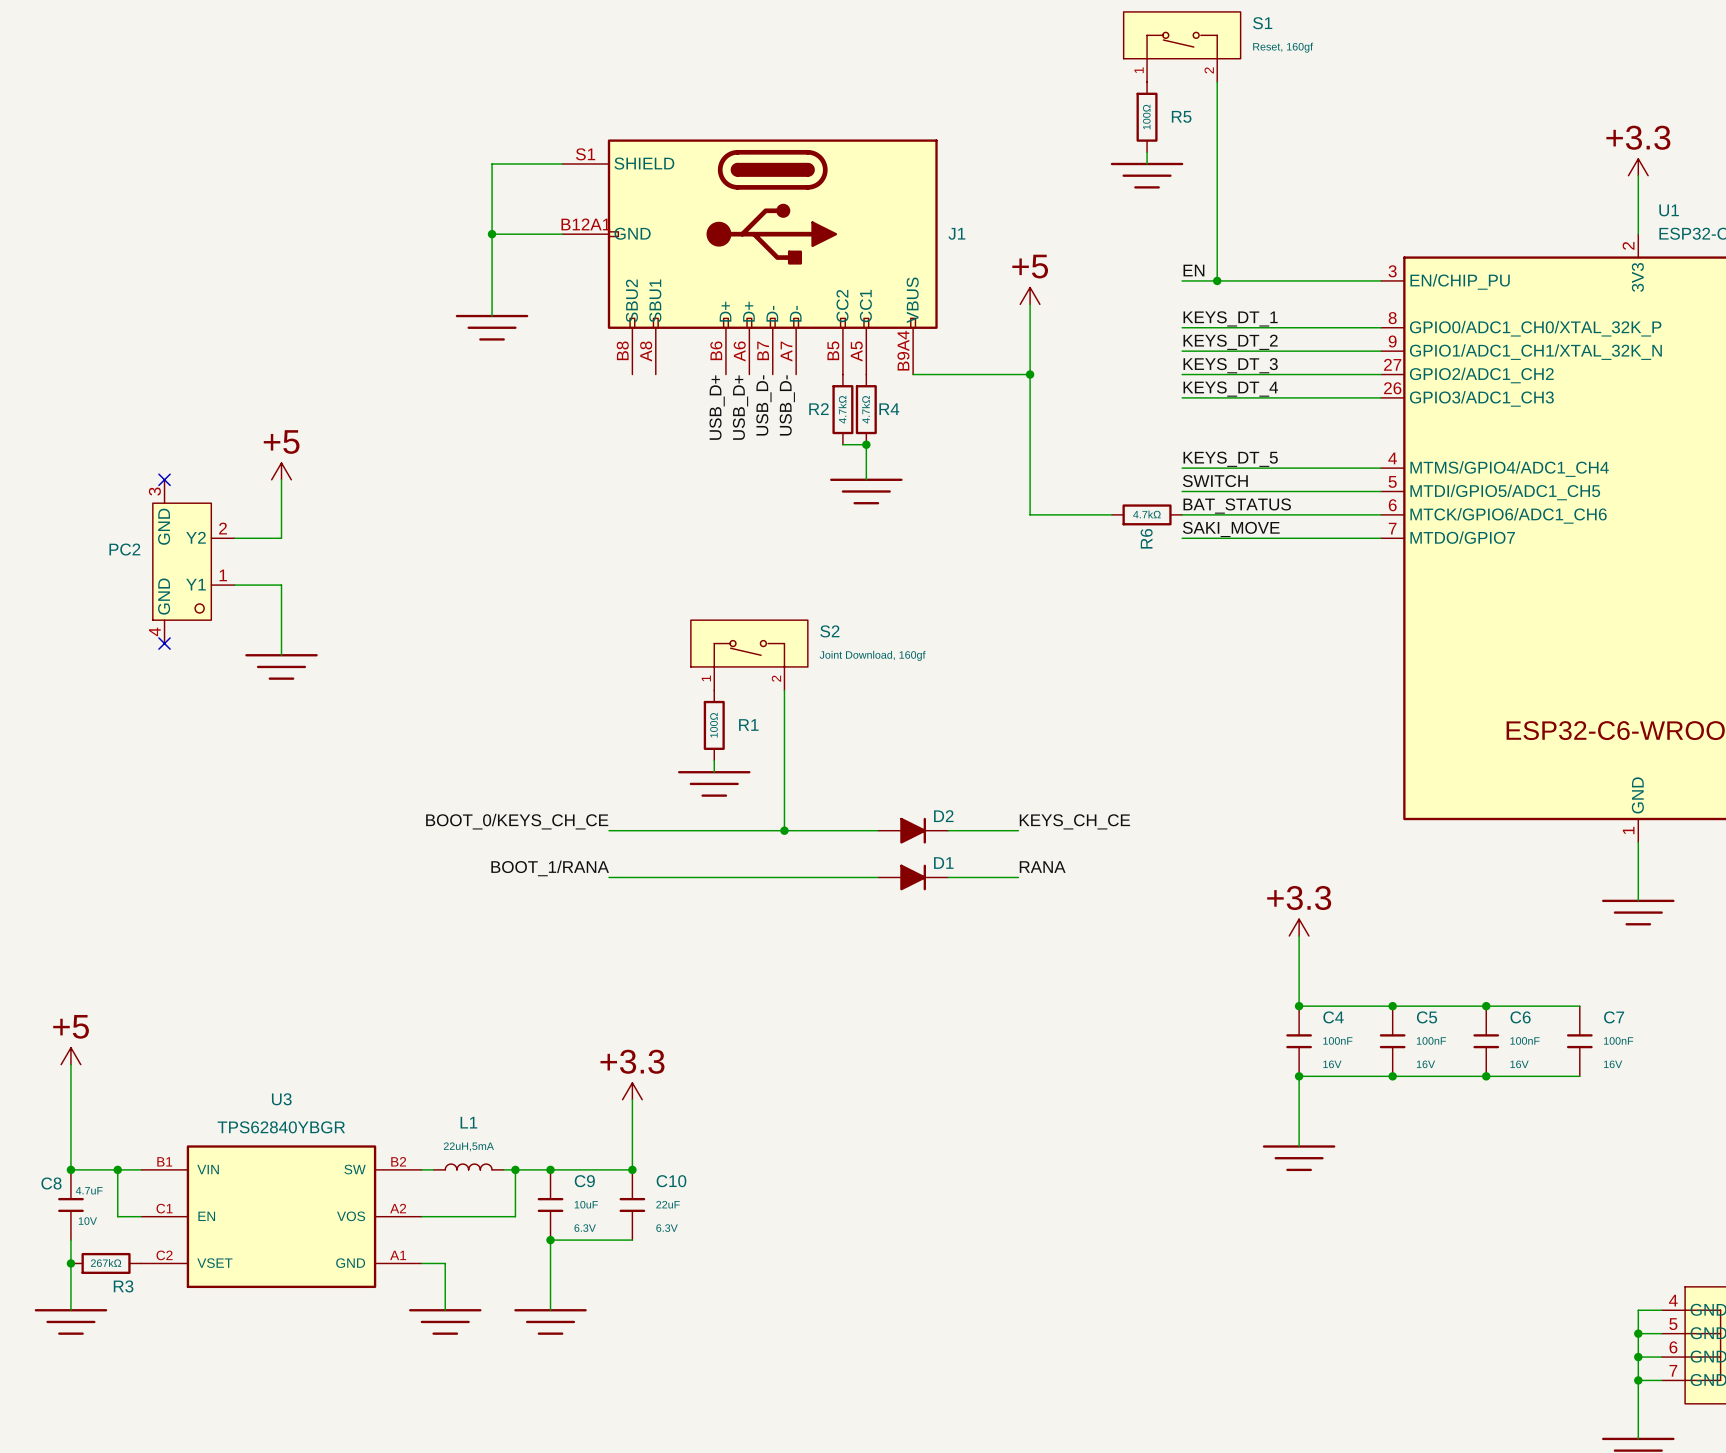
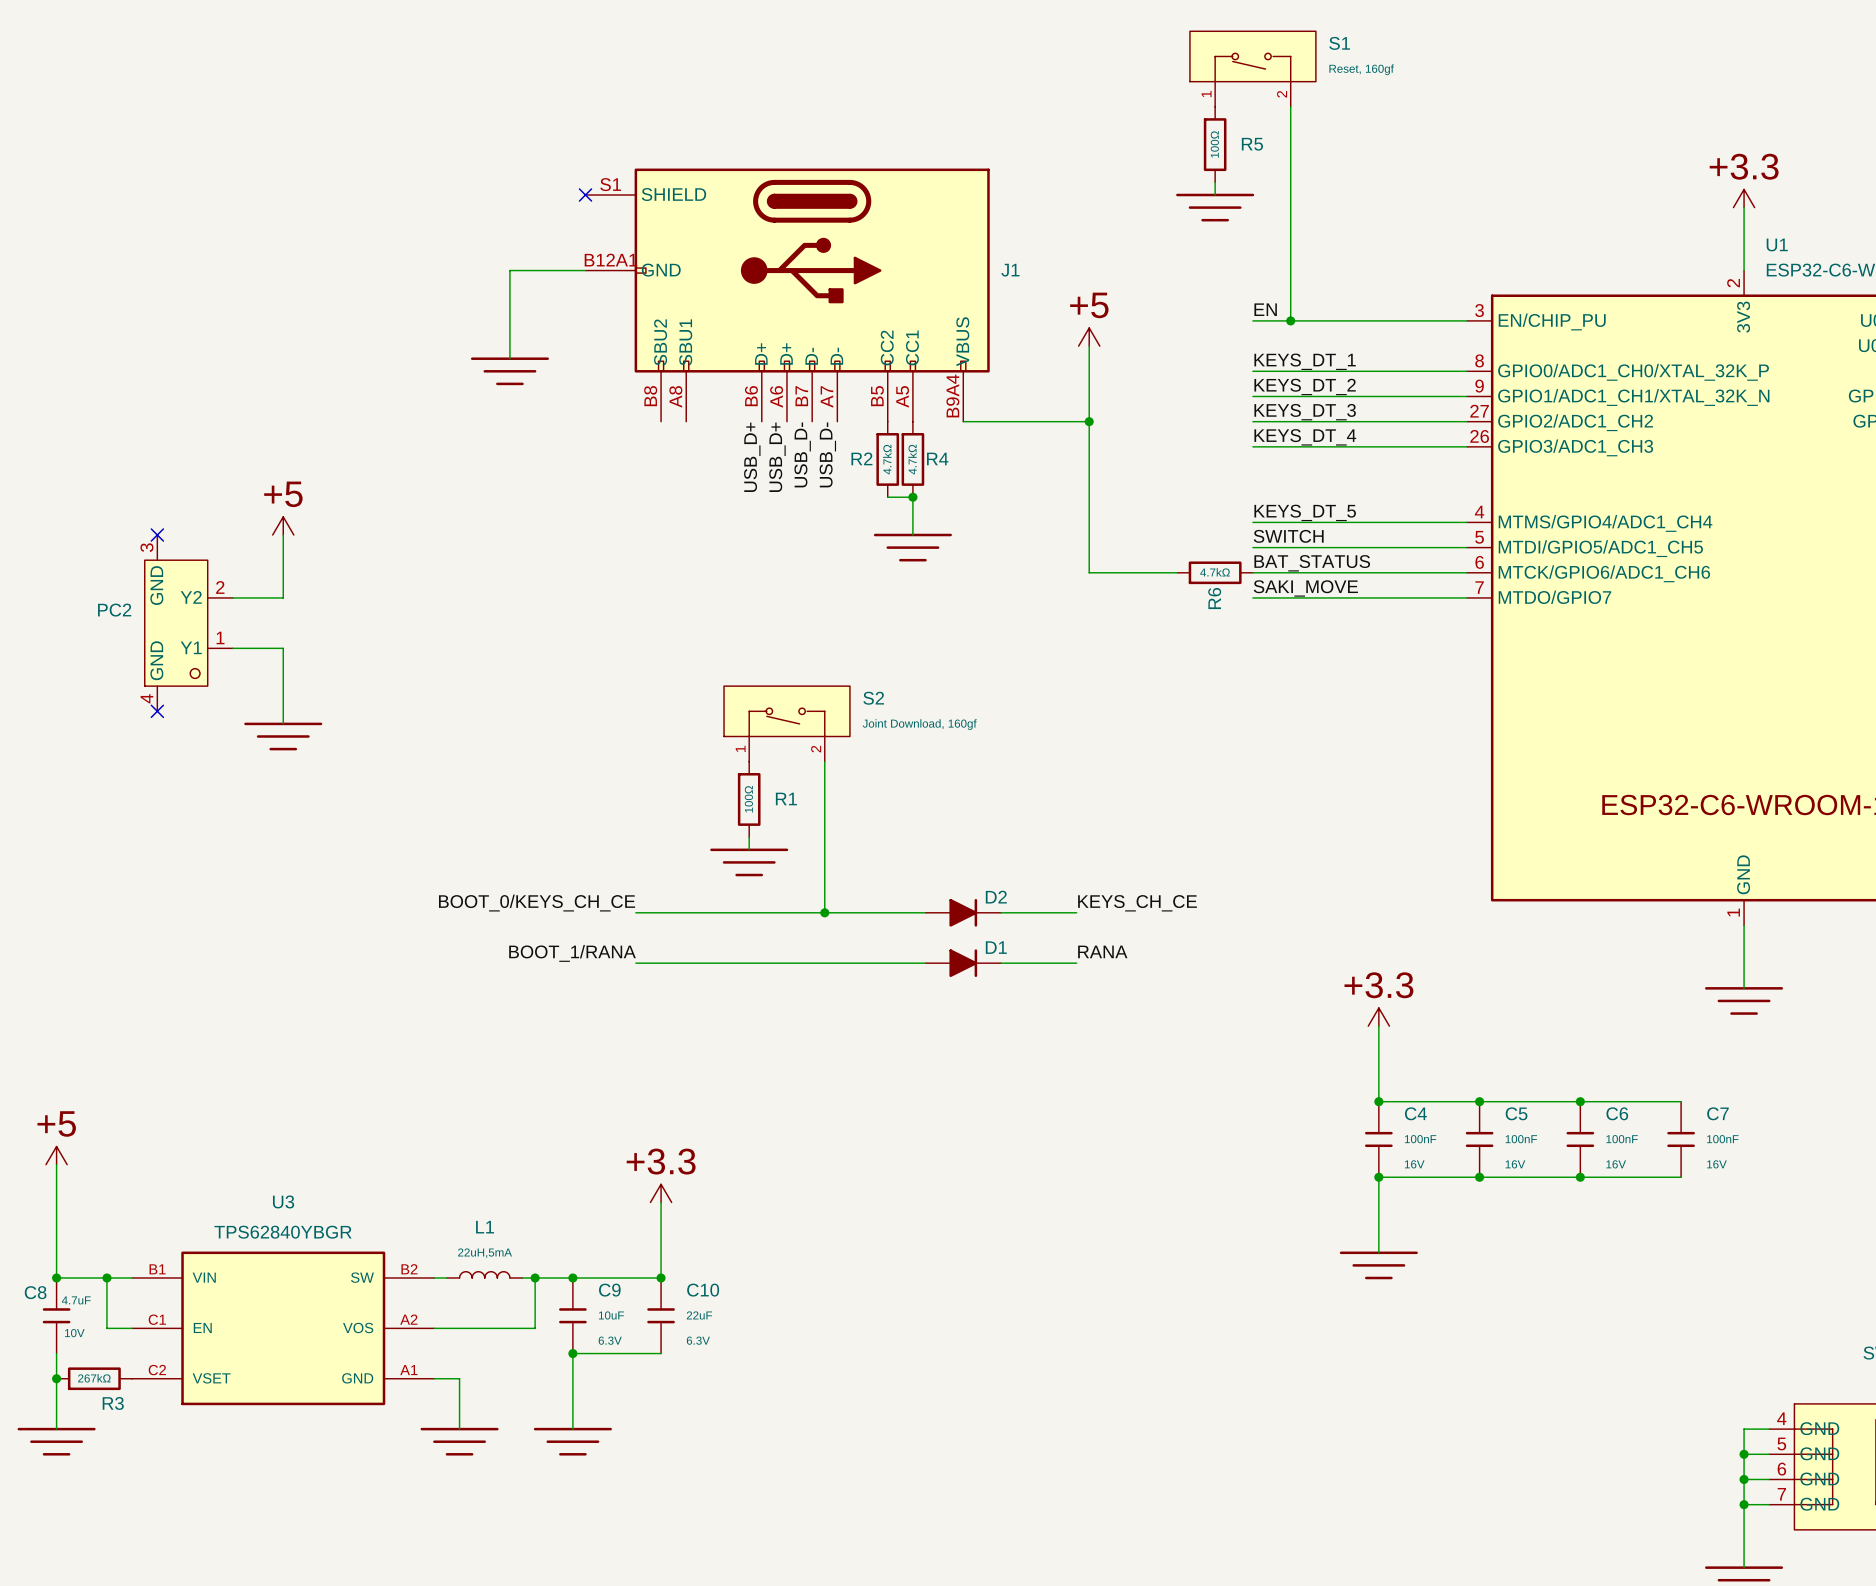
wire: (562, 164) (492, 164) (492, 234) -> none
no-connect mark: none -> (585, 195)
junction: (492, 234) -> none

